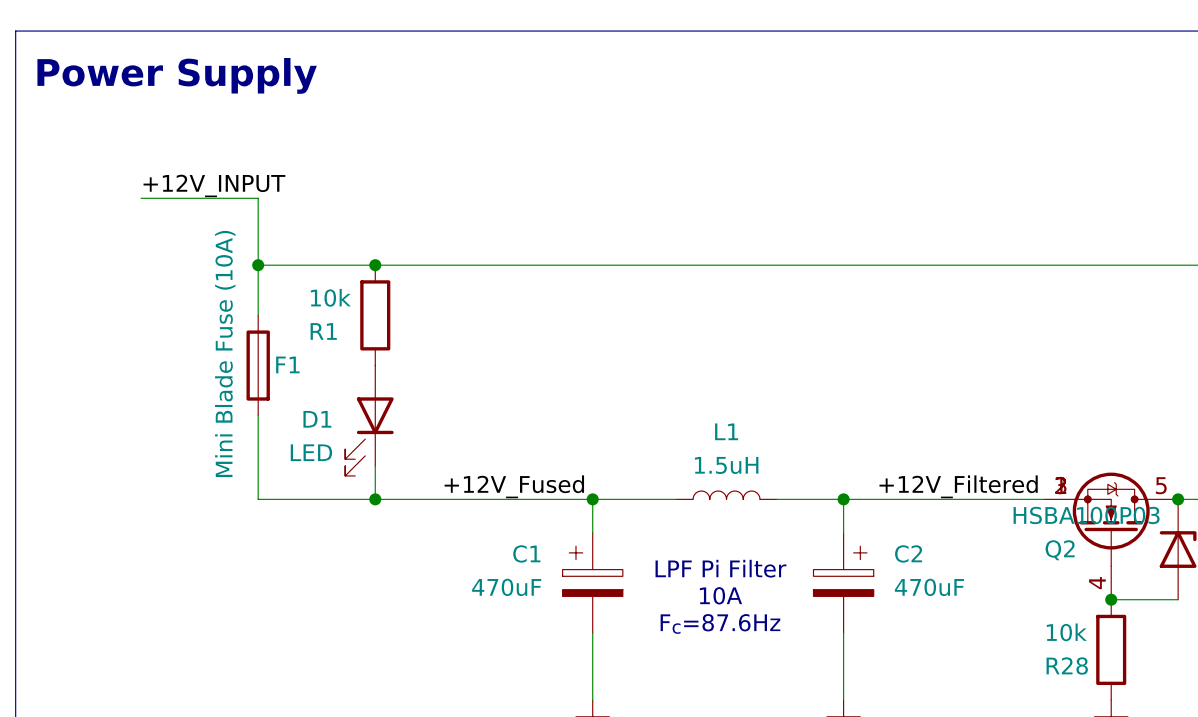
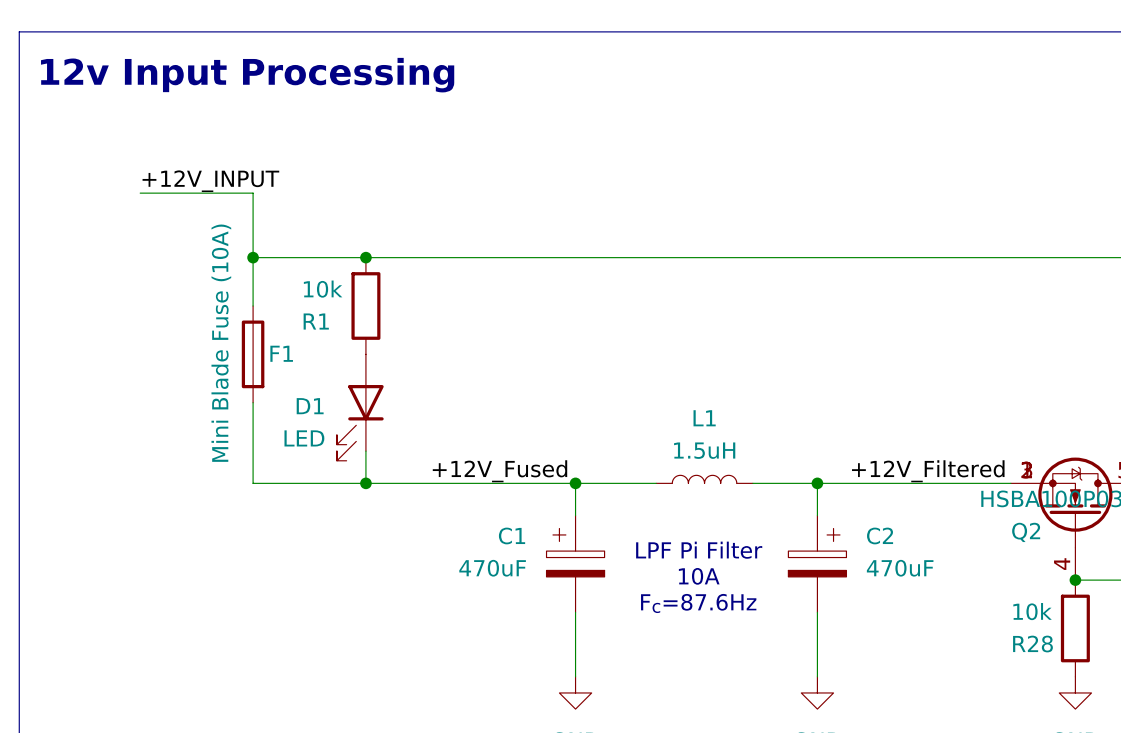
text: Power Supply (177, 75) -> 12v Input Processing (247, 75)

